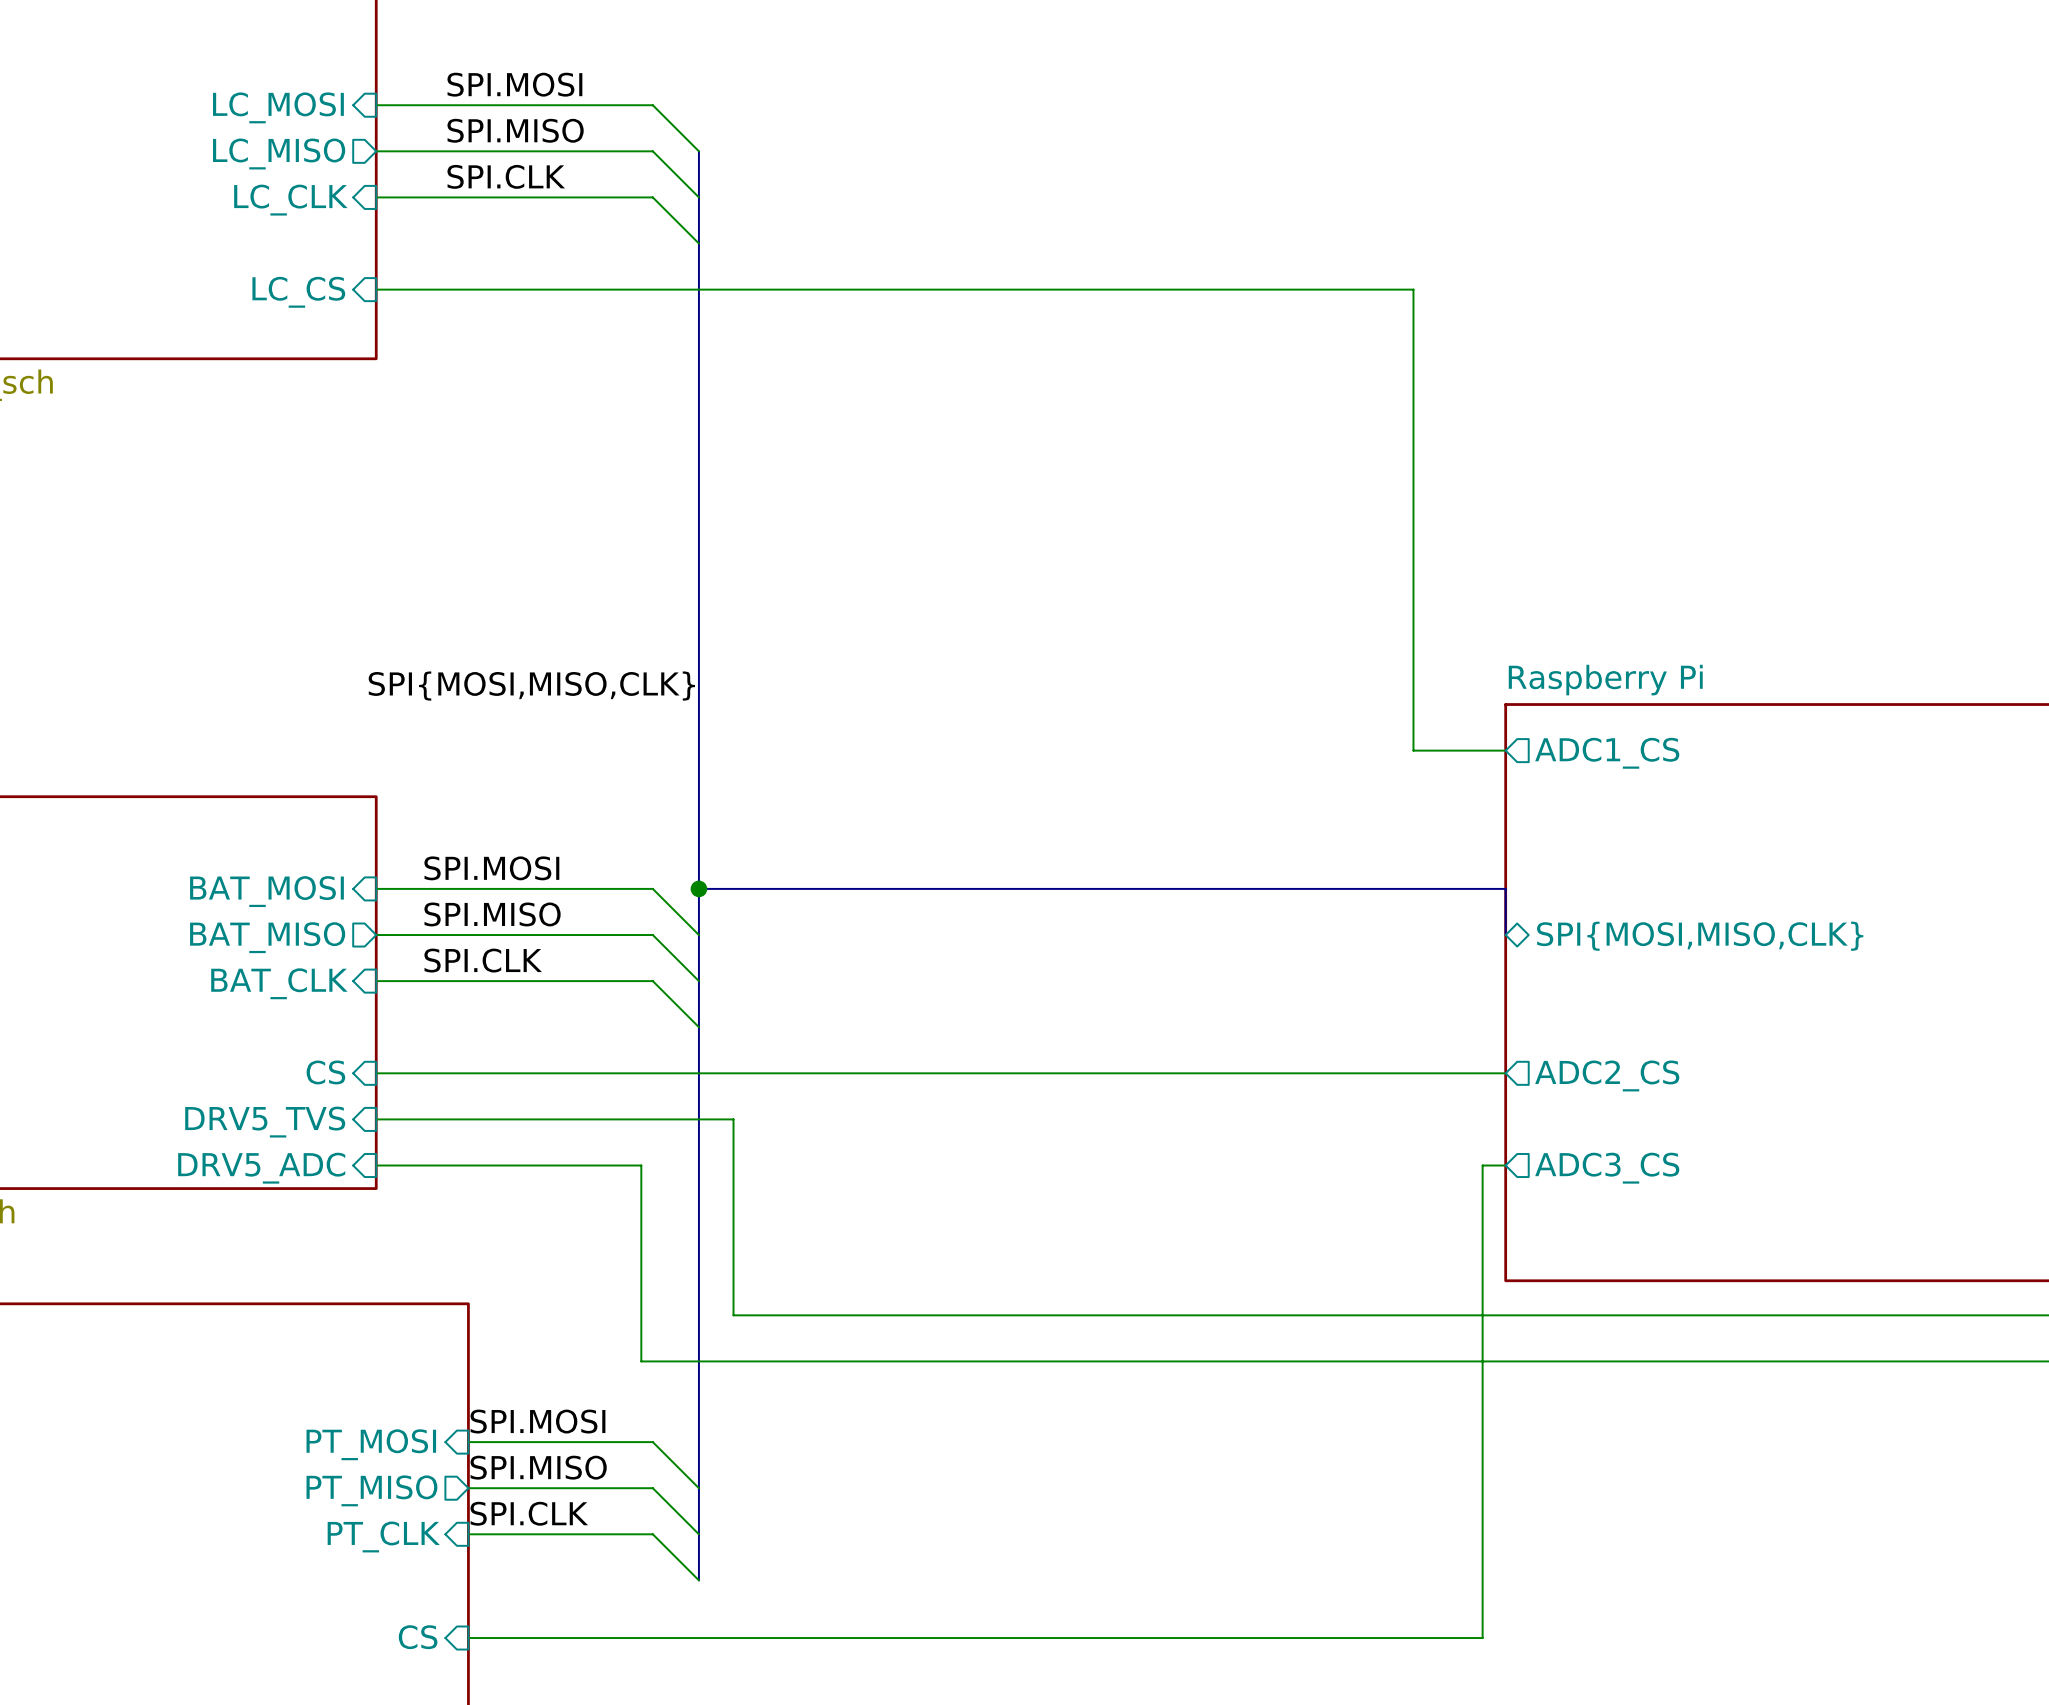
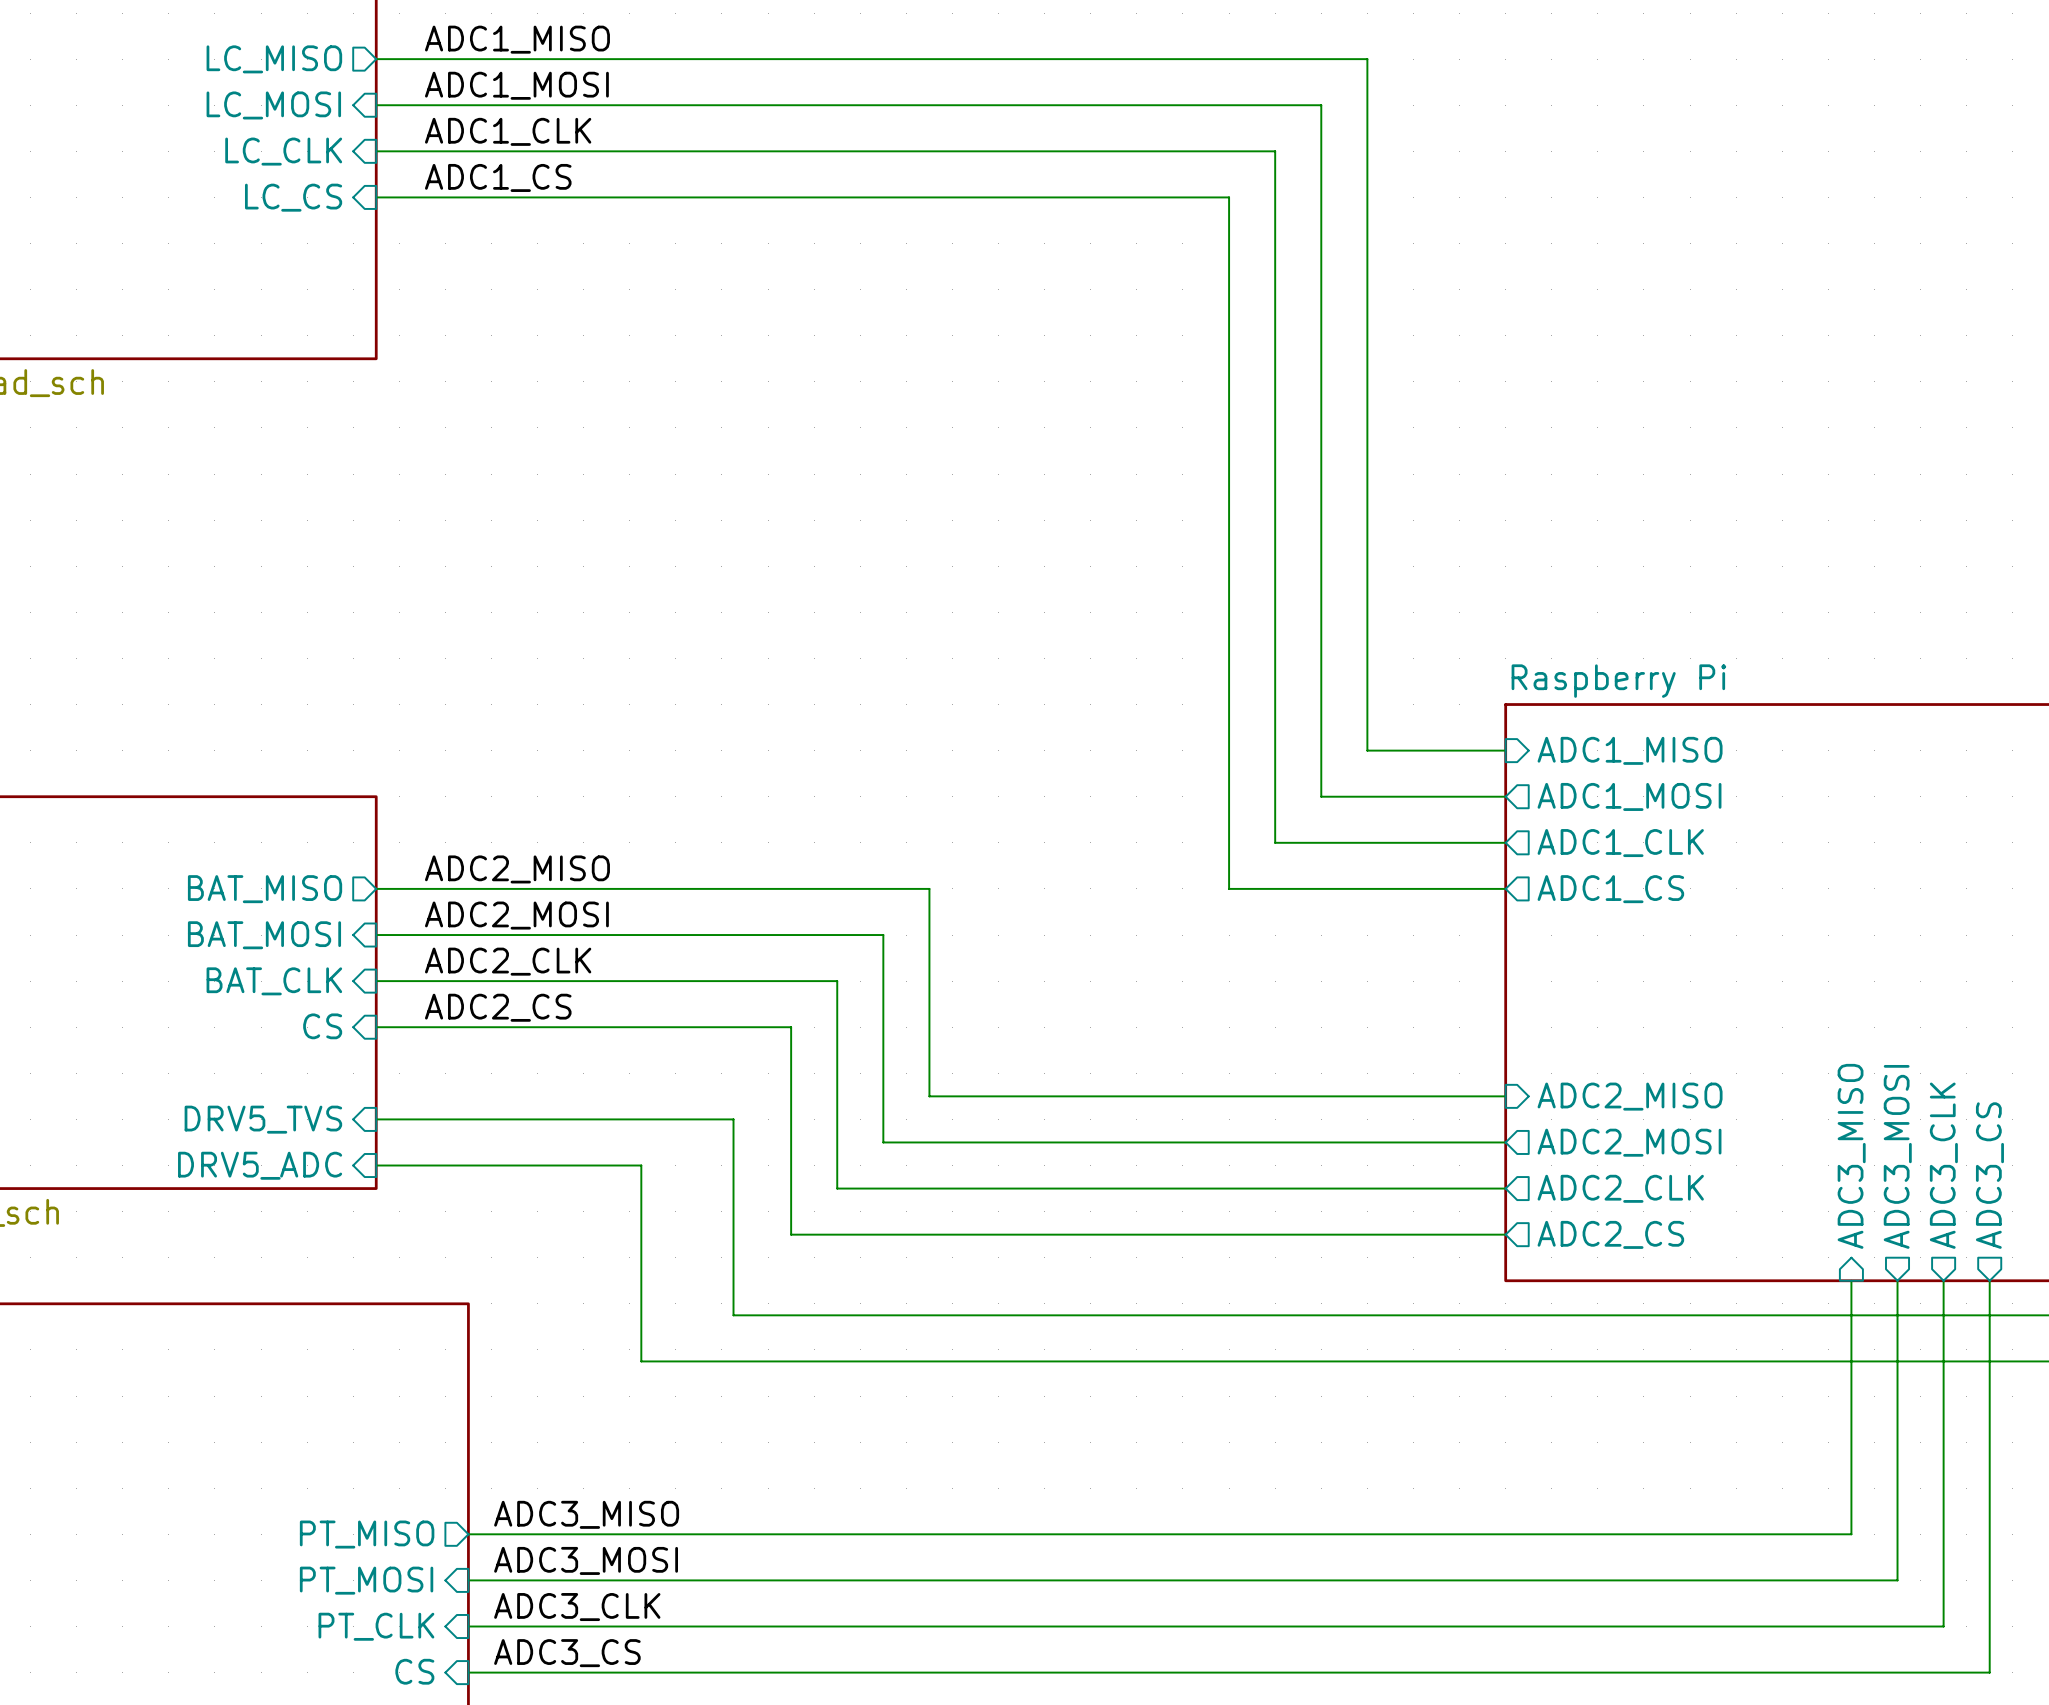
label: none -> ADC1_MISO (517, 39)
sheet pin: none -> LC_MISO (274, 59)
label: SPI.MOSI (514, 84) -> none
label: none -> ADC1_MOSI (516, 85)
wire: (652, 105) (698, 151) -> (652, 105) (1321, 105) (1321, 796) (1505, 796)
label: SPI.MISO (515, 130) -> none
label: none -> ADC1_CLK (508, 131)
wire: (652, 151) (698, 197) -> (652, 151) (1275, 151) (1275, 842) (1505, 842)
bus: (698, 151) (698, 1580) -> none
sheet pin shape: output (279, 153) -> input (283, 151)
sheet pin: LC_MISO (279, 153) -> LC_CLK (283, 151)
label: SPI.CLK (506, 176) -> none
label: none -> ADC1_CS (498, 177)
wire: (652, 197) (698, 243) -> (652, 197) (1229, 197) (1229, 888) (1505, 888)
sheet pin: LC_CLK (290, 200) -> LC_CS (293, 197)
wire: (376, 289) (1413, 289) (1413, 750) -> (376, 59) (1367, 59) (1367, 750) (1413, 750)
sheet pin: LC_CS (298, 292) -> none
label: SPI{MOSI,MISO,CLK} (531, 686) -> none
sheet pin shape: output (1607, 753) -> input (1630, 750)
sheet pin: ADC1_CS (1607, 753) -> ADC1_MISO (1630, 750)
sheet pin: none -> ADC1_MOSI (1629, 796)
sheet pin: none -> ADC1_CLK (1620, 843)
label: SPI.MOSI (491, 868) -> ADC2_MISO (517, 869)
wire: (652, 888) (698, 935) -> (652, 888) (929, 888) (929, 1096) (1505, 1096)
bus: (698, 888) (1505, 888) (1505, 935) -> none
junction: (698, 888) -> none
sheet pin shape: input (266, 891) -> output (265, 889)
sheet pin: BAT_MOSI (266, 891) -> BAT_MISO (265, 889)
sheet pin: none -> ADC1_CS (1610, 889)
label: SPI.MISO (492, 914) -> ADC2_MOSI (516, 915)
wire: (652, 935) (698, 981) -> (652, 935) (883, 935) (883, 1142) (1505, 1142)
sheet pin: SPI{MOSI,MISO,CLK} (1700, 936) -> none
sheet pin shape: output (267, 937) -> input (264, 935)
sheet pin: BAT_MISO (267, 937) -> BAT_MOSI (264, 935)
label: SPI.CLK (483, 960) -> ADC2_CLK (508, 961)
wire: (652, 981) (698, 1027) -> (652, 981) (837, 981) (837, 1188) (1505, 1188)
label: none -> ADC2_CS (498, 1007)
wire: none -> (376, 1027) (791, 1027) (791, 1234) (1505, 1234)
sheet pin position: CS (325, 1072) -> CS (322, 1026)
wire: (376, 1073) (1505, 1073) -> none
sheet pin position: ADC2_CS (1607, 1075) -> ADC2_CS (1610, 1234)
sheet pin: none -> ADC2_MISO (1630, 1096)
sheet pin: none -> ADC2_MOSI (1629, 1142)
sheet pin: none -> ADC3_MISO (1851, 1156)
sheet pin: none -> ADC3_MOSI (1897, 1156)
wire: (1505, 1165) (1482, 1165) (1482, 1638) (468, 1638) -> none
sheet pin: ADC3_CS (1607, 1168) -> none
sheet pin: none -> ADC3_CLK (1943, 1165)
sheet pin: none -> ADC3_CS (1989, 1175)
sheet pin: none -> ADC2_CLK (1620, 1188)
wire: none -> (1897, 1280) (1897, 1580) (468, 1580)
wire: none -> (1943, 1280) (1943, 1626) (468, 1626)
wire: none -> (1989, 1280) (1989, 1672) (468, 1672)
label: SPI.MOSI (537, 1421) -> none
wire: (468, 1442) (652, 1442) (698, 1488) -> none
sheet pin position: PT_MOSI (371, 1444) -> PT_MOSI (366, 1580)
label: SPI.MISO (538, 1467) -> none
wire: (468, 1488) (652, 1488) (698, 1534) -> none
sheet pin: PT_MISO (371, 1490) -> none
label: SPI.CLK (529, 1513) -> none
label: none -> ADC3_MISO (586, 1514)
wire: (652, 1534) (698, 1580) -> (652, 1534) (1851, 1534) (1851, 1280)
sheet pin shape: input (383, 1536) -> output (367, 1534)
sheet pin: PT_CLK (383, 1536) -> PT_MISO (367, 1534)
label: none -> ADC3_MOSI (586, 1560)
label: none -> ADC3_CLK (577, 1607)
sheet pin: none -> PT_CLK (376, 1626)
sheet pin position: CS (418, 1637) -> CS (414, 1671)
label: none -> ADC3_CS (567, 1653)

